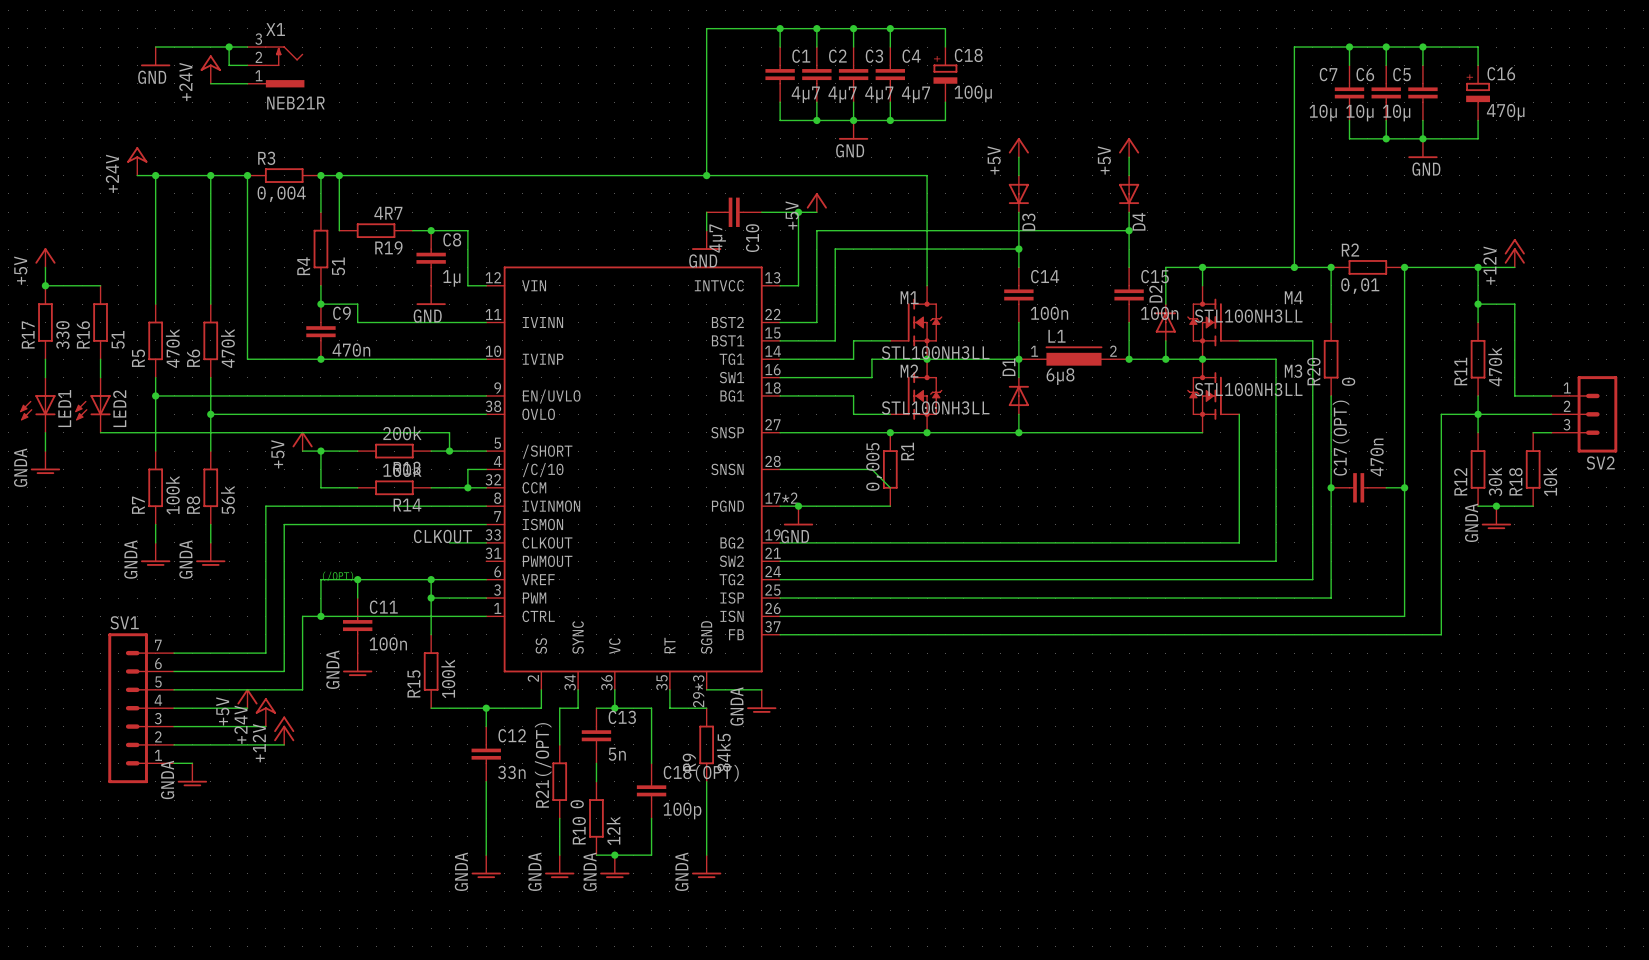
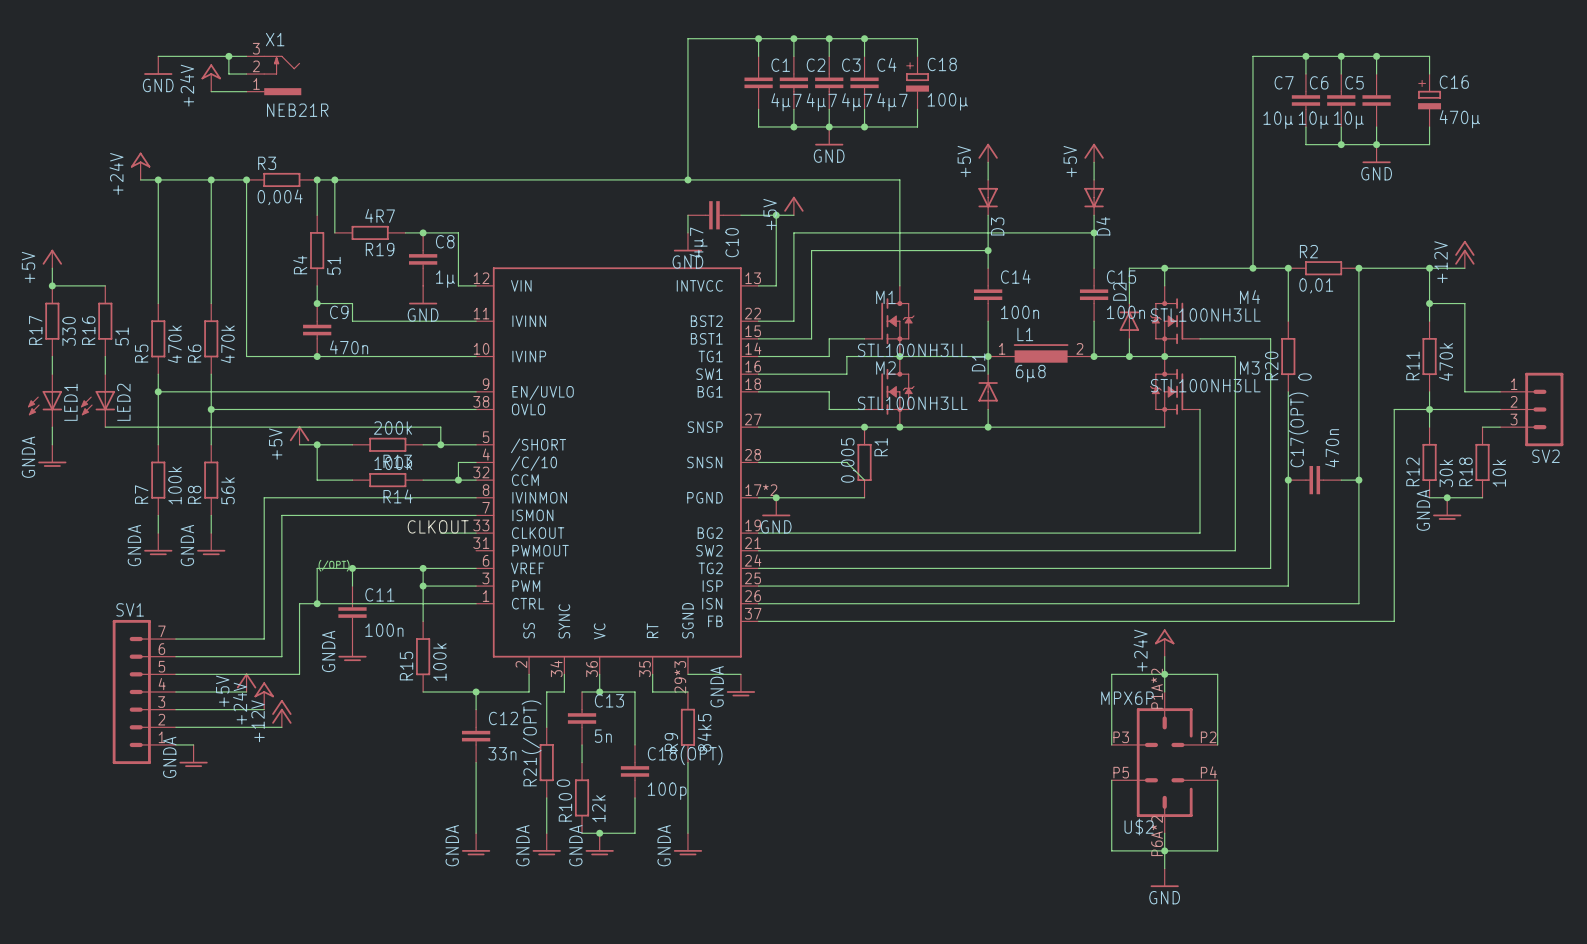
power symbol: none -> +24V (1164, 643)
wire: none -> (1164, 656) (1164, 691)
junction: none -> (1164, 674)
wire: none -> (1111, 744) (1111, 674) (1217, 674) (1217, 744)
U$2: none -> MPX6P (1164, 762)
wire: none -> (1111, 780) (1111, 850) (1217, 850) (1217, 780)
wire: none -> (1164, 833) (1164, 868)
junction: none -> (1164, 850)
power symbol: none -> GND (1164, 877)

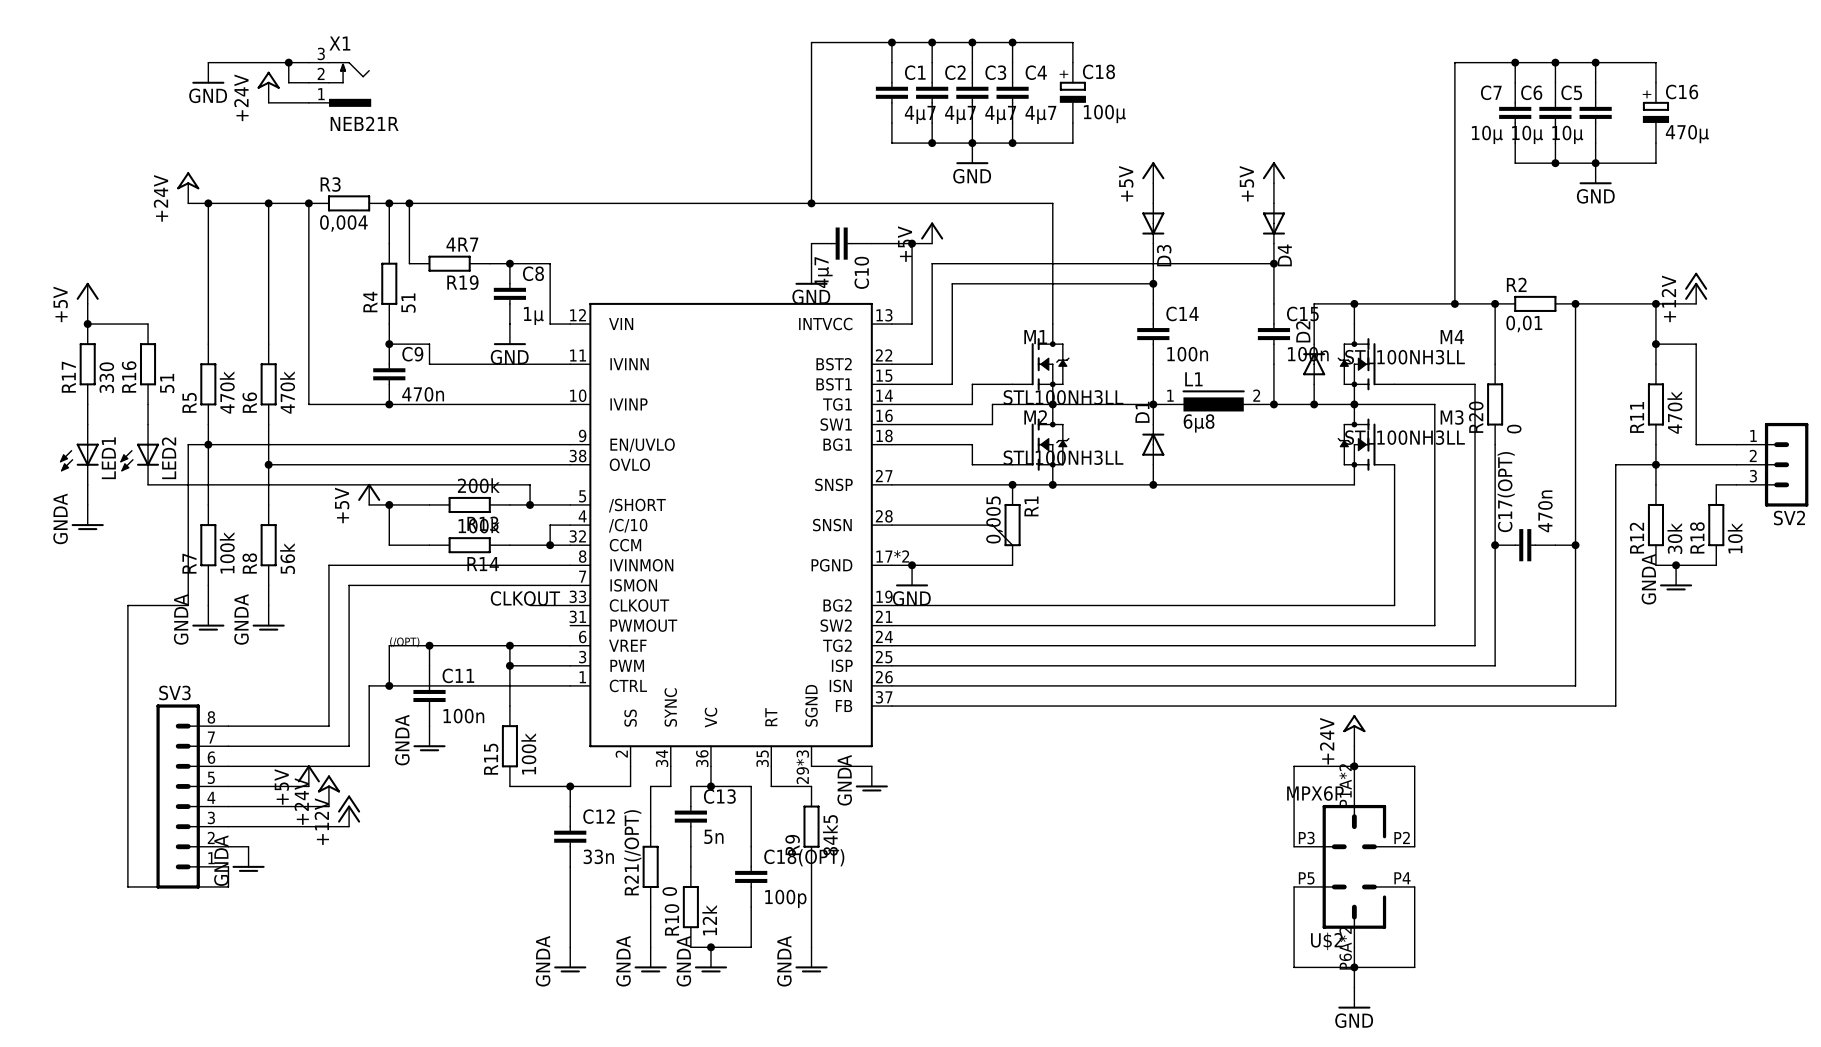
wire: none -> (208, 444) (188, 444) (188, 605) (127, 605) (127, 886) (228, 886) (228, 866)
SV1: (144, 691) -> none
SV3: none -> (192, 796)

